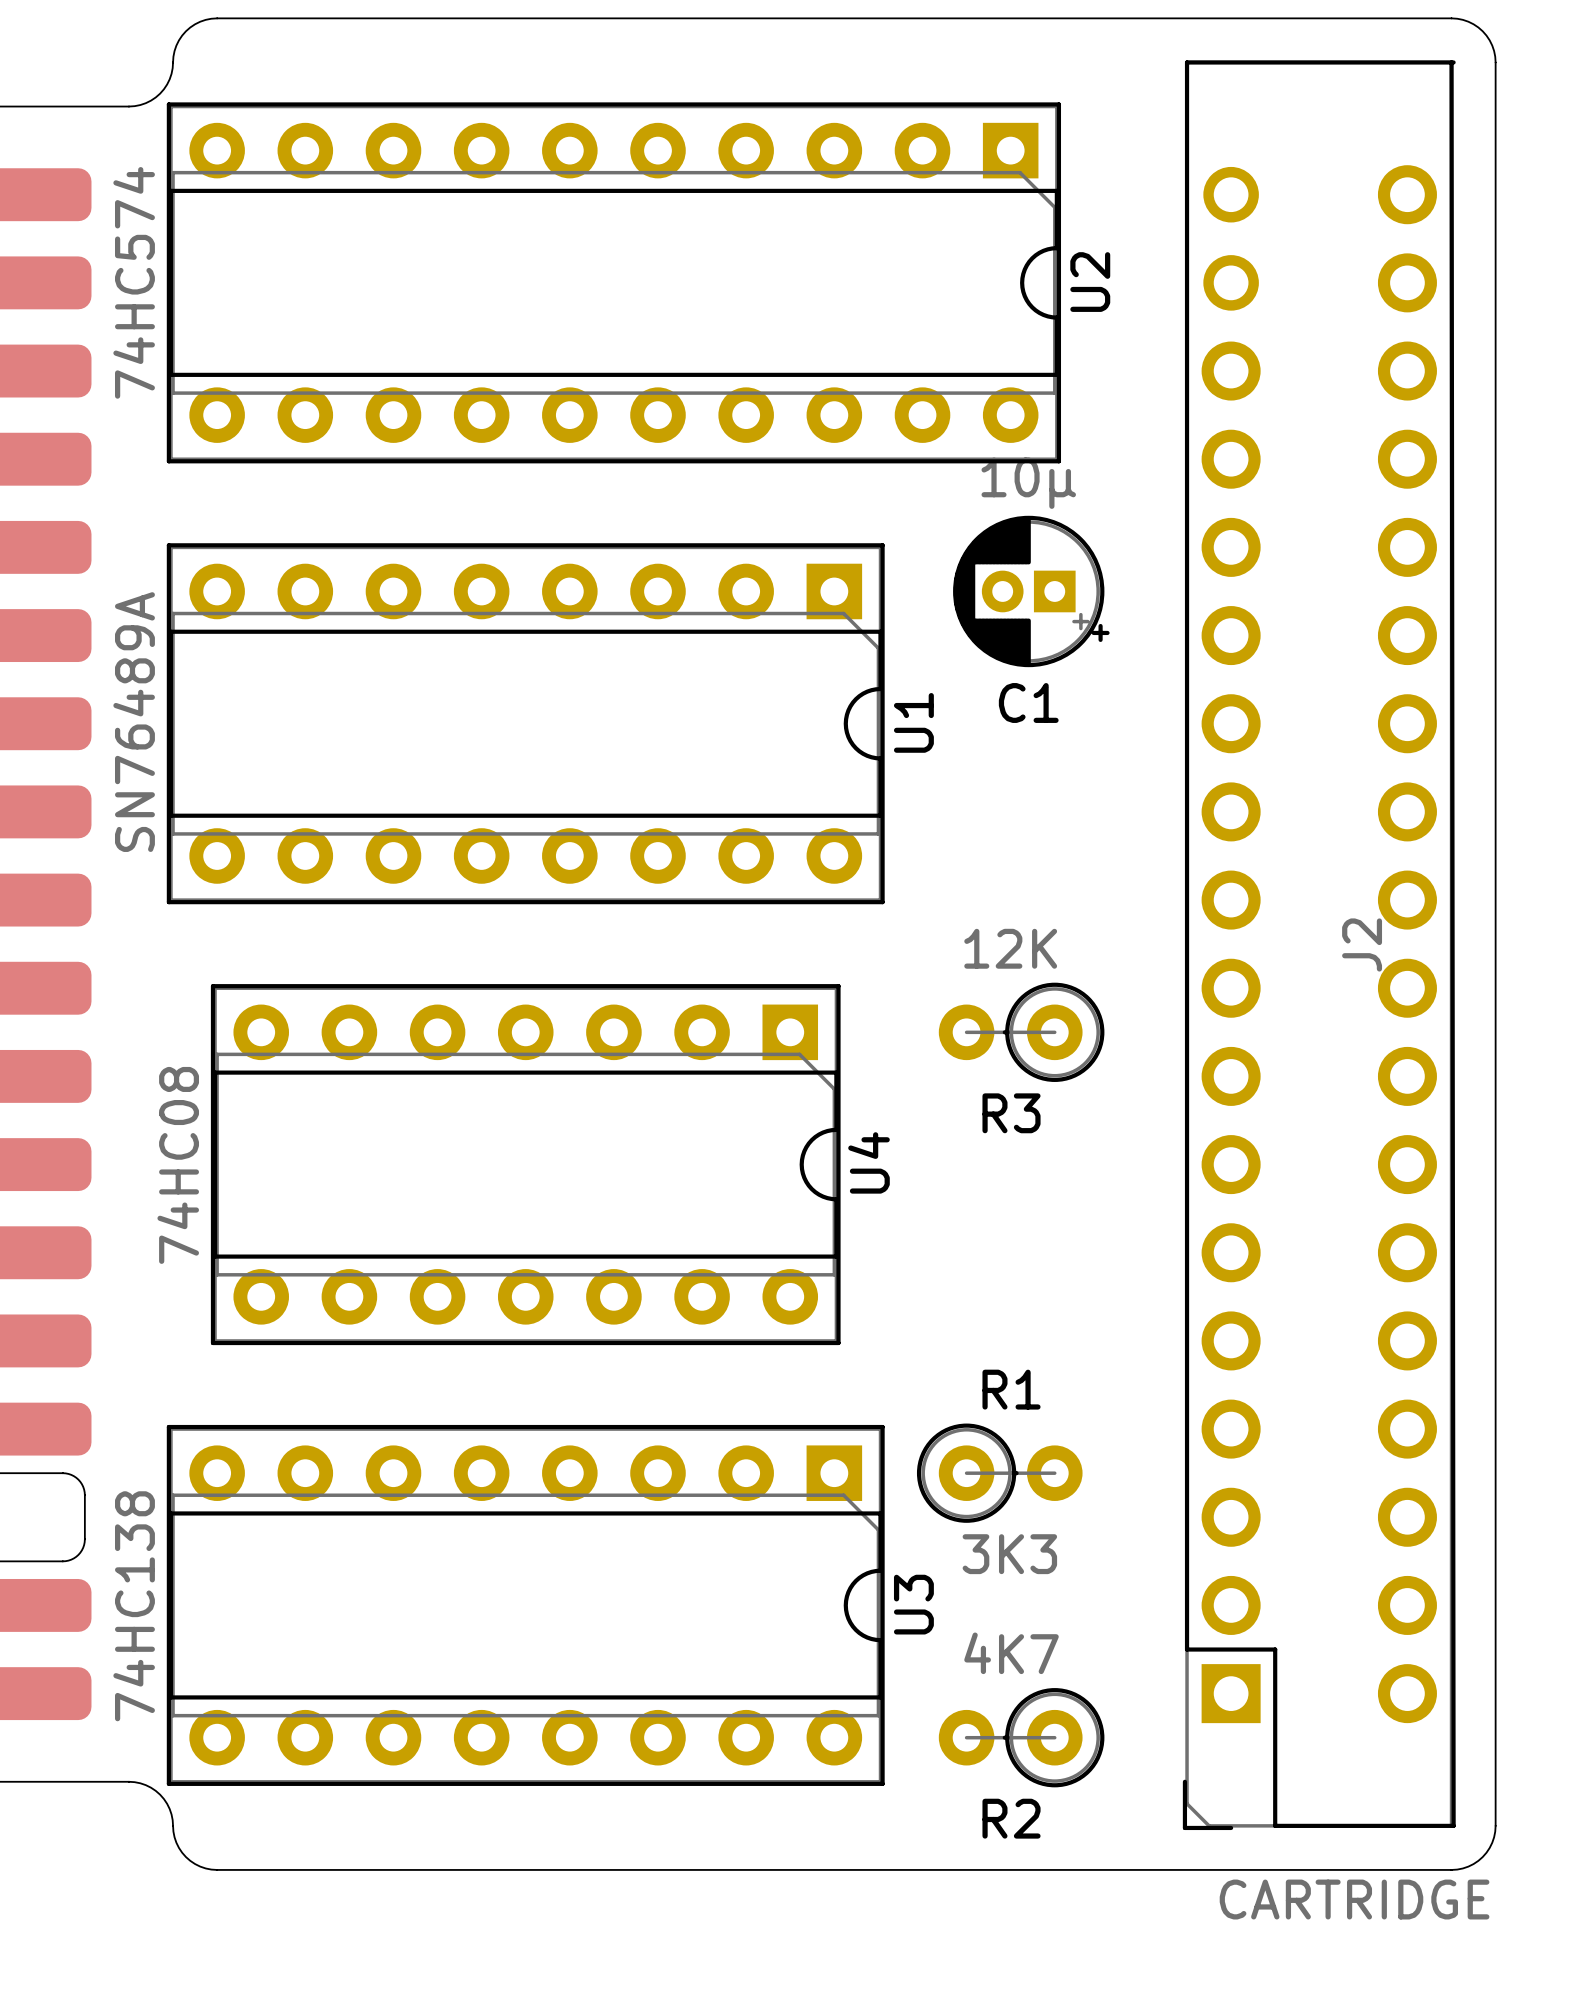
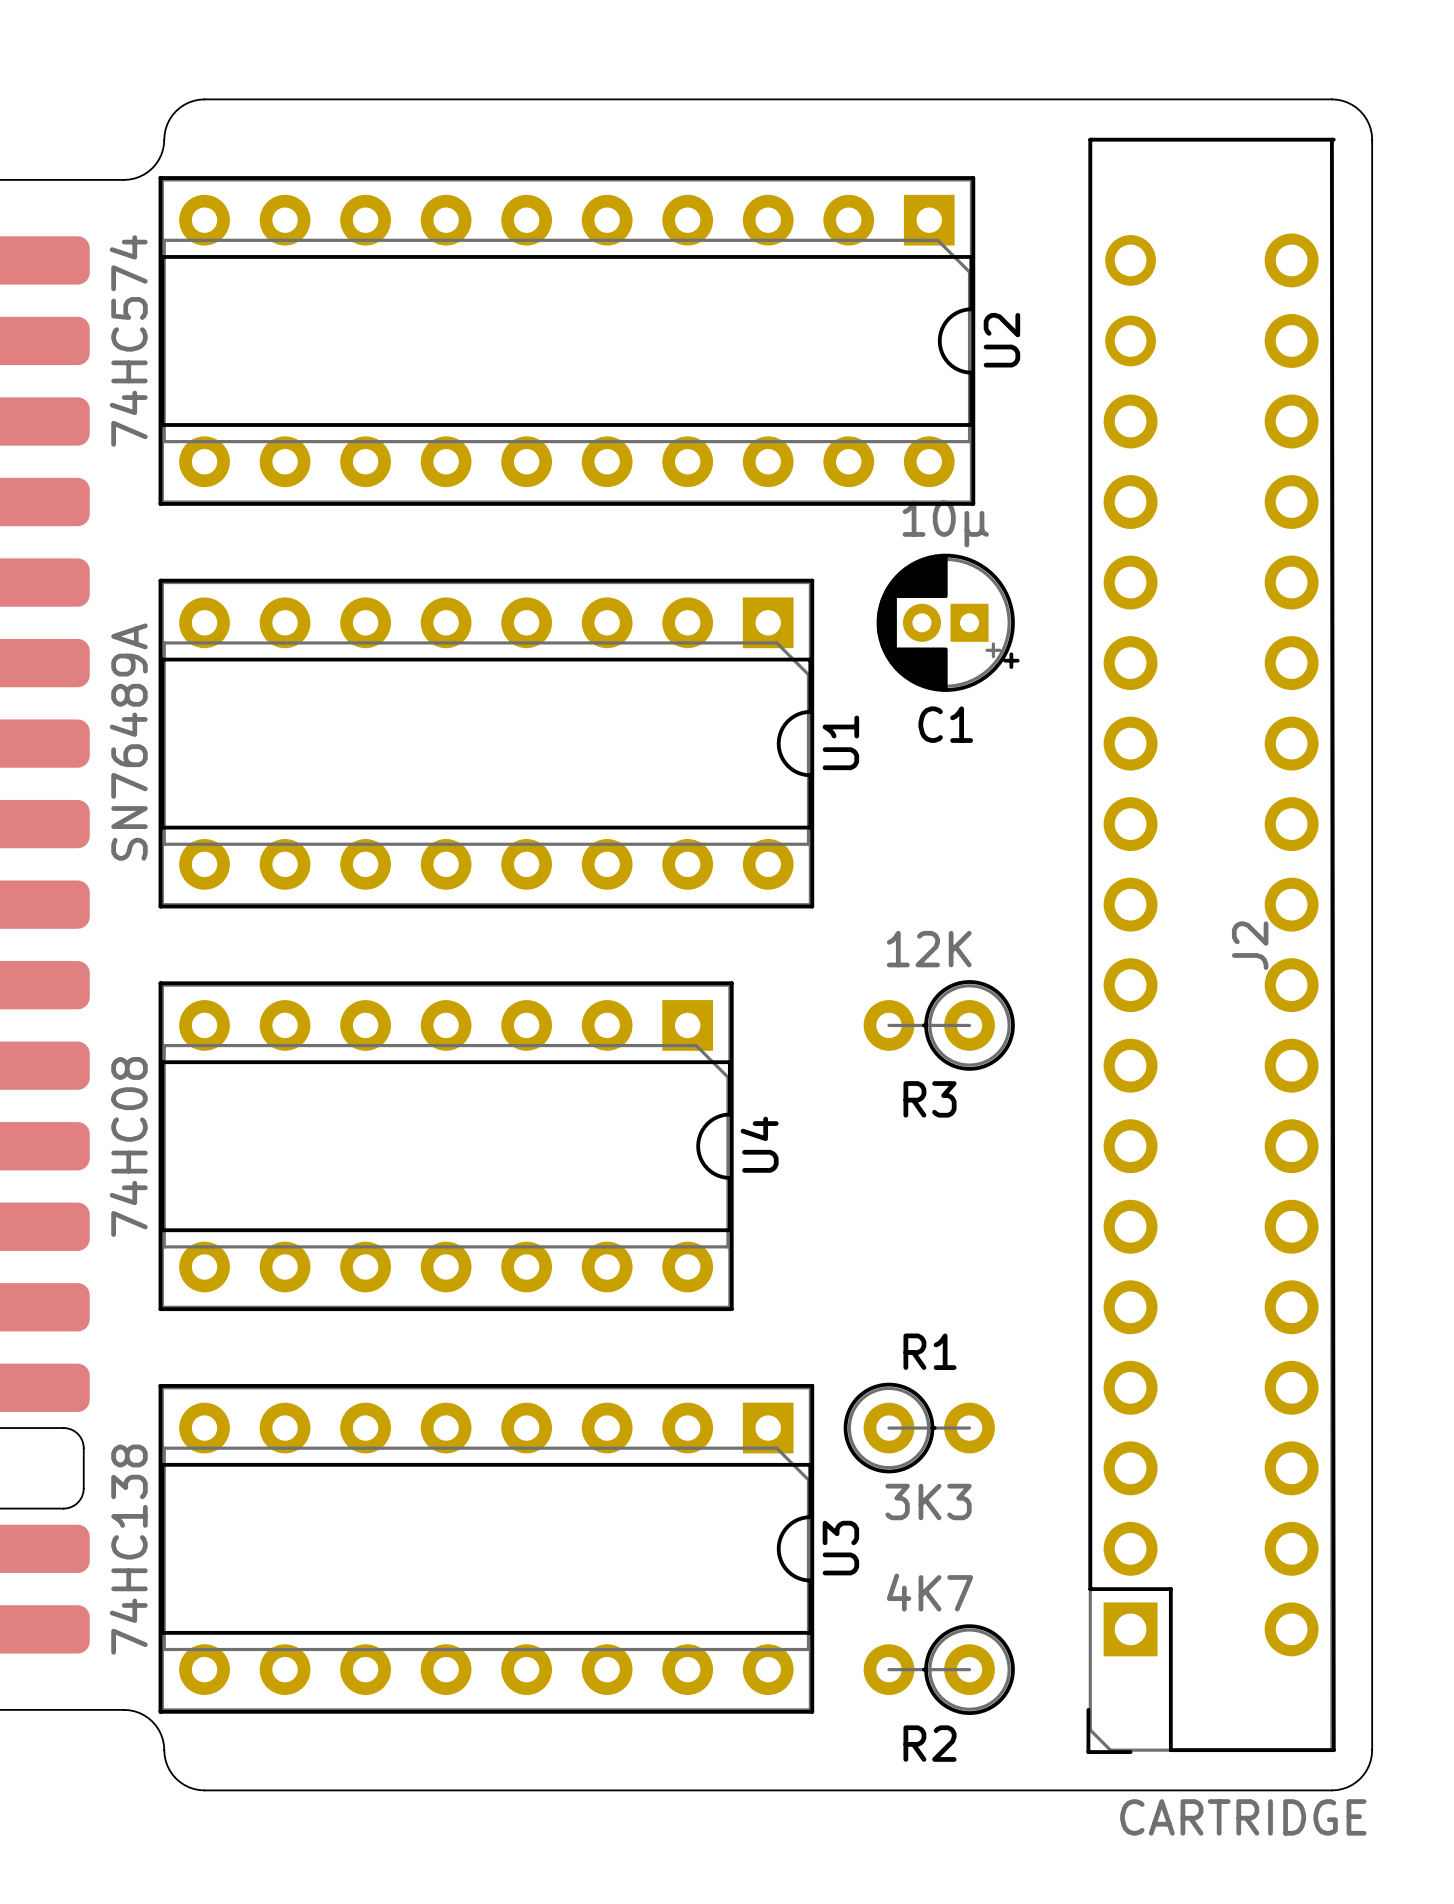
U4 position: (525, 1164) -> (446, 1146)

